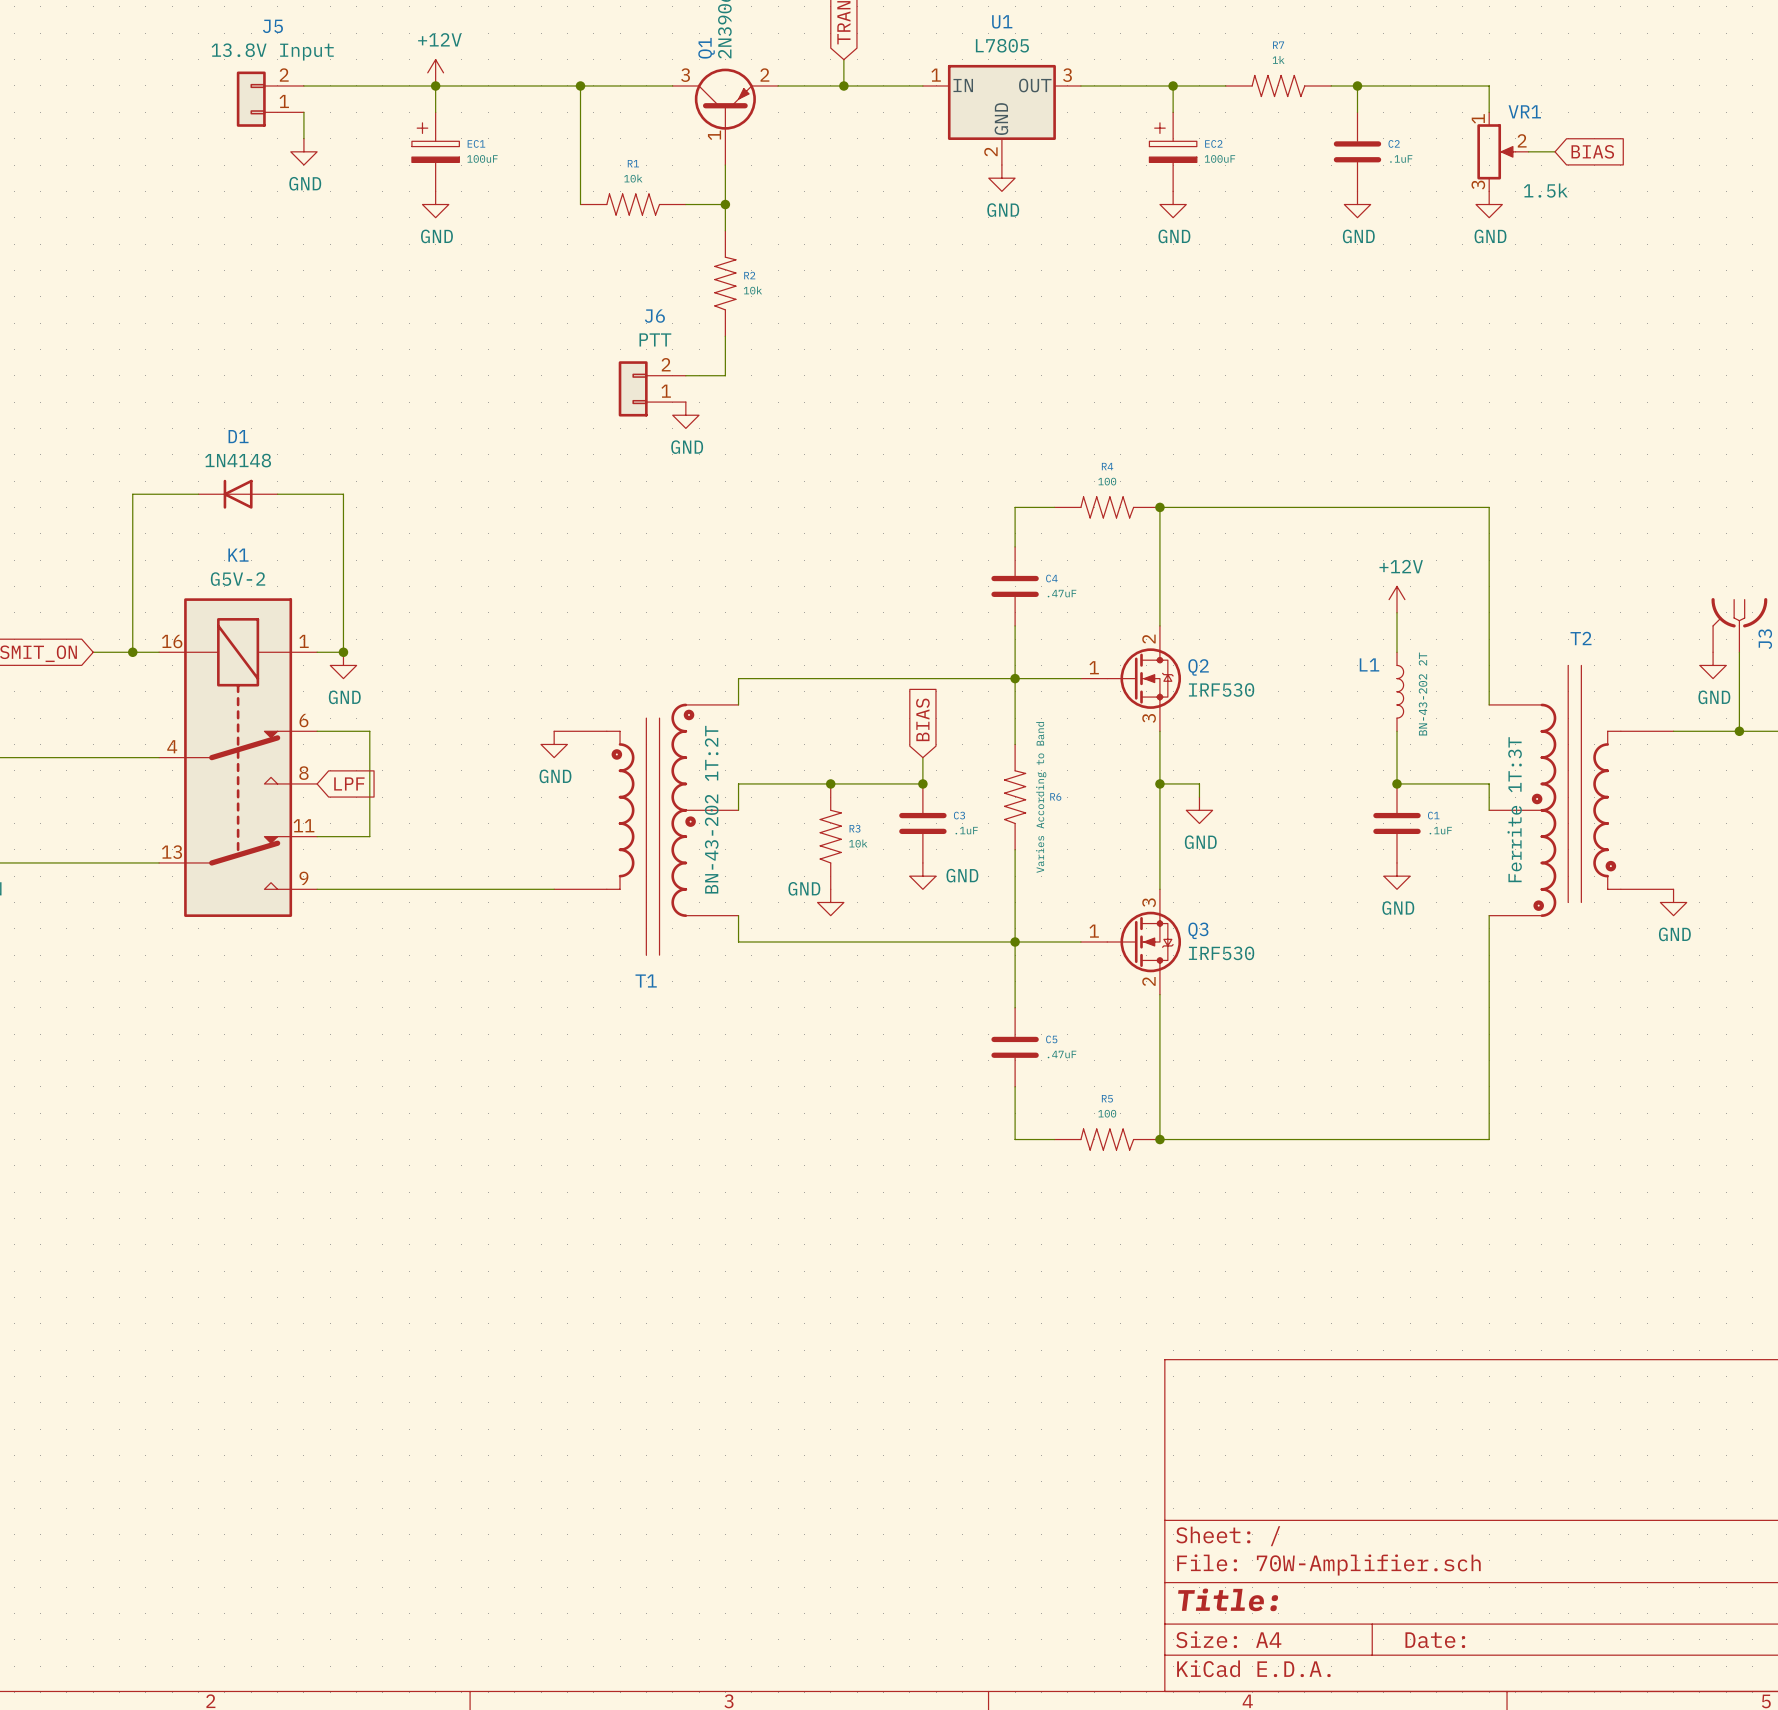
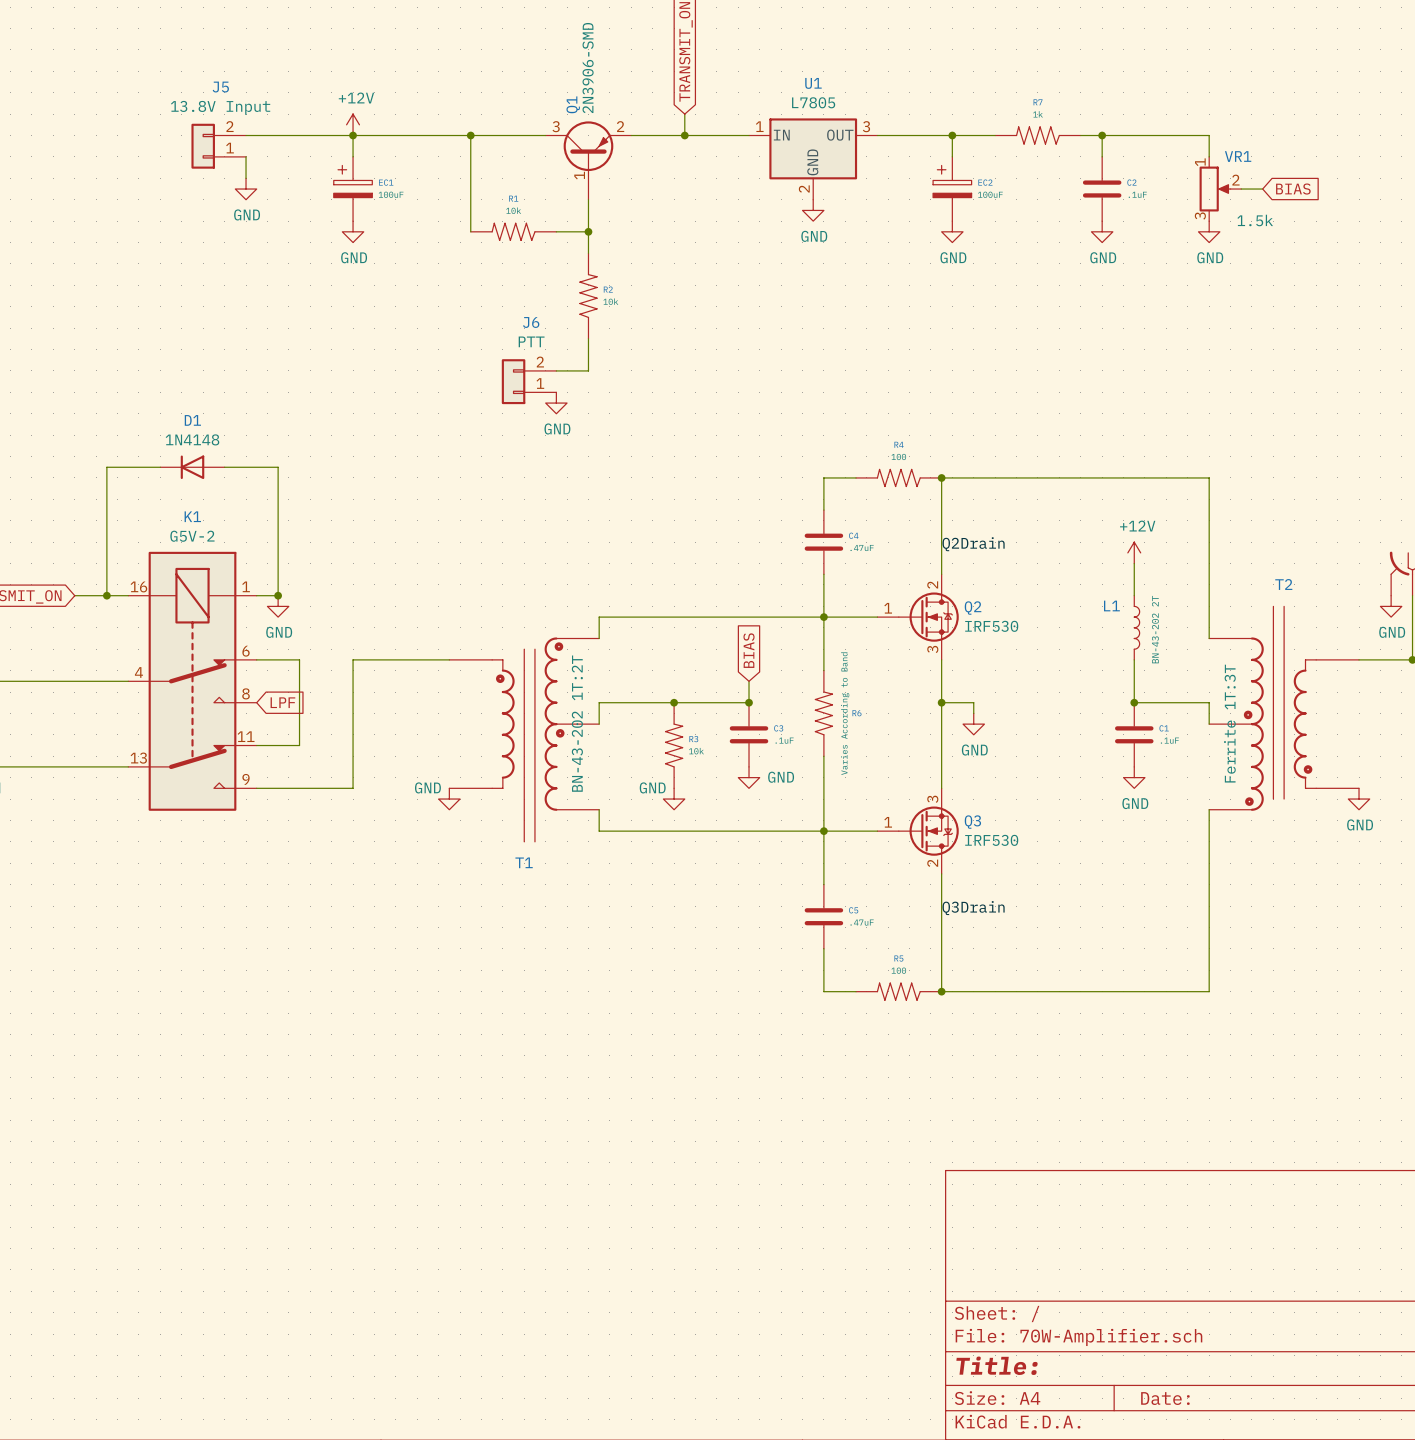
label: none -> Q2Drain (973, 544)
power symbol position: GND (554, 744) -> GND (449, 799)
power symbol text position: GND (555, 776) -> GND (427, 787)
wire: (435, 889) (554, 889) -> (353, 788) (353, 659) (449, 659)
label: none -> Q3Drain (973, 908)

